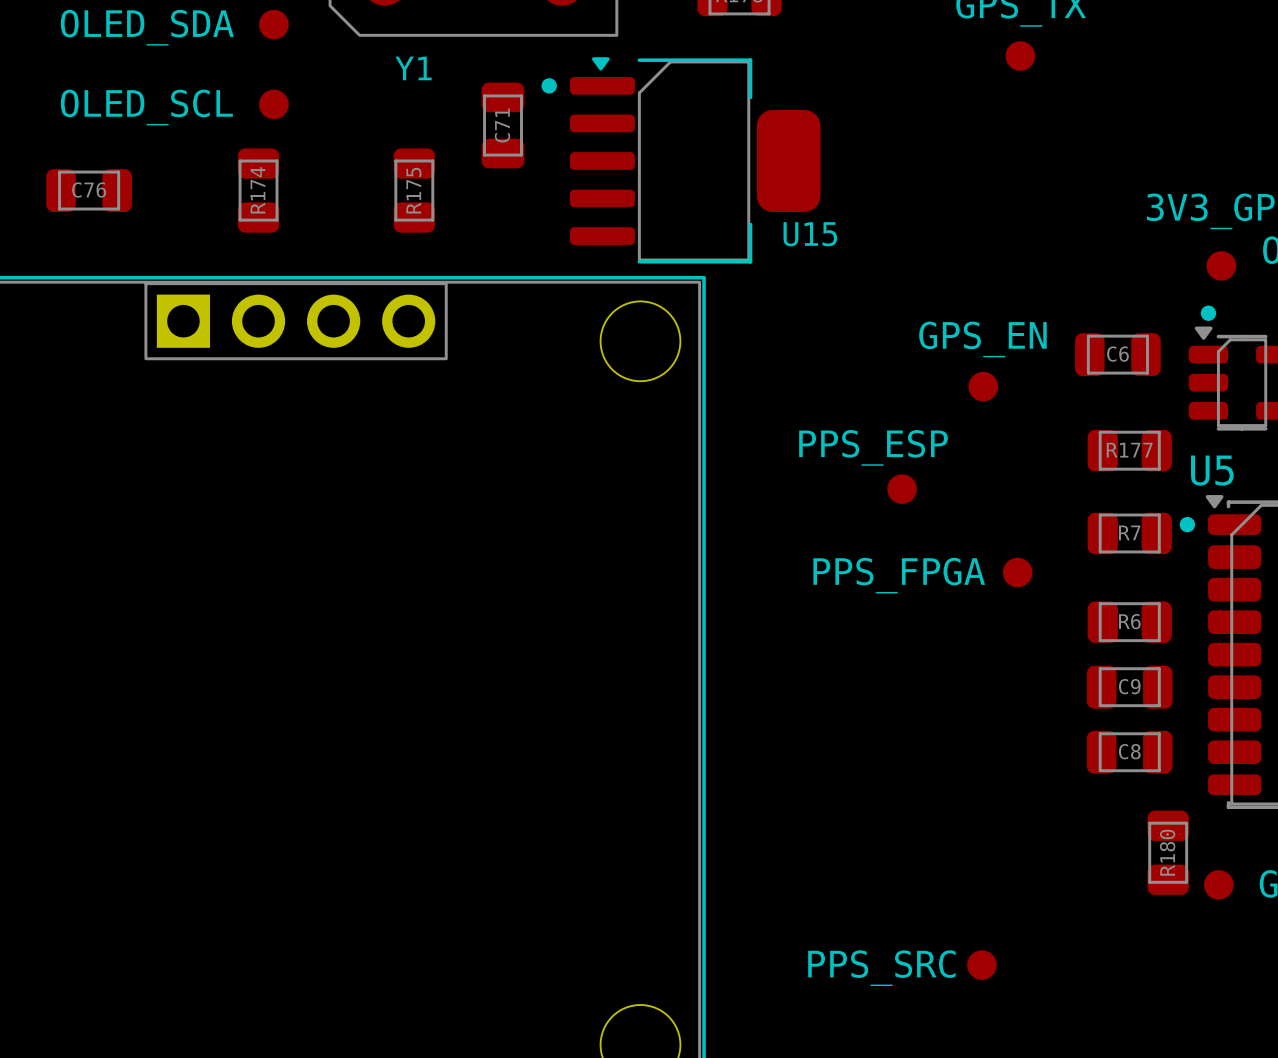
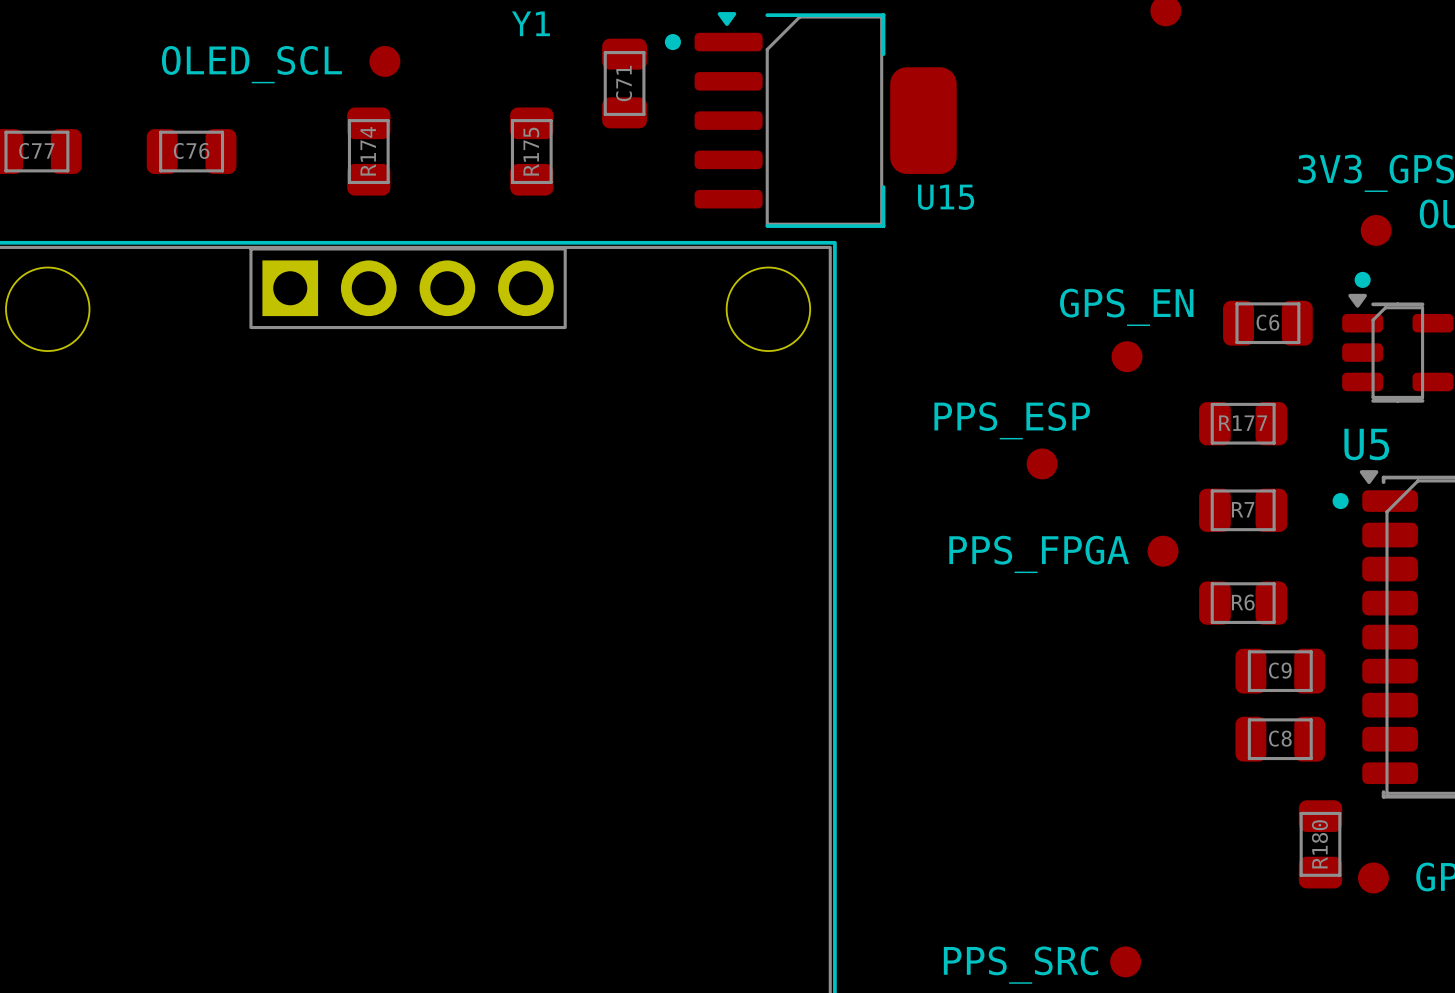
R177 position: (1129, 450) -> (1243, 423)
R7 position: (1129, 533) -> (1243, 510)
R6 position: (1129, 622) -> (1243, 603)

